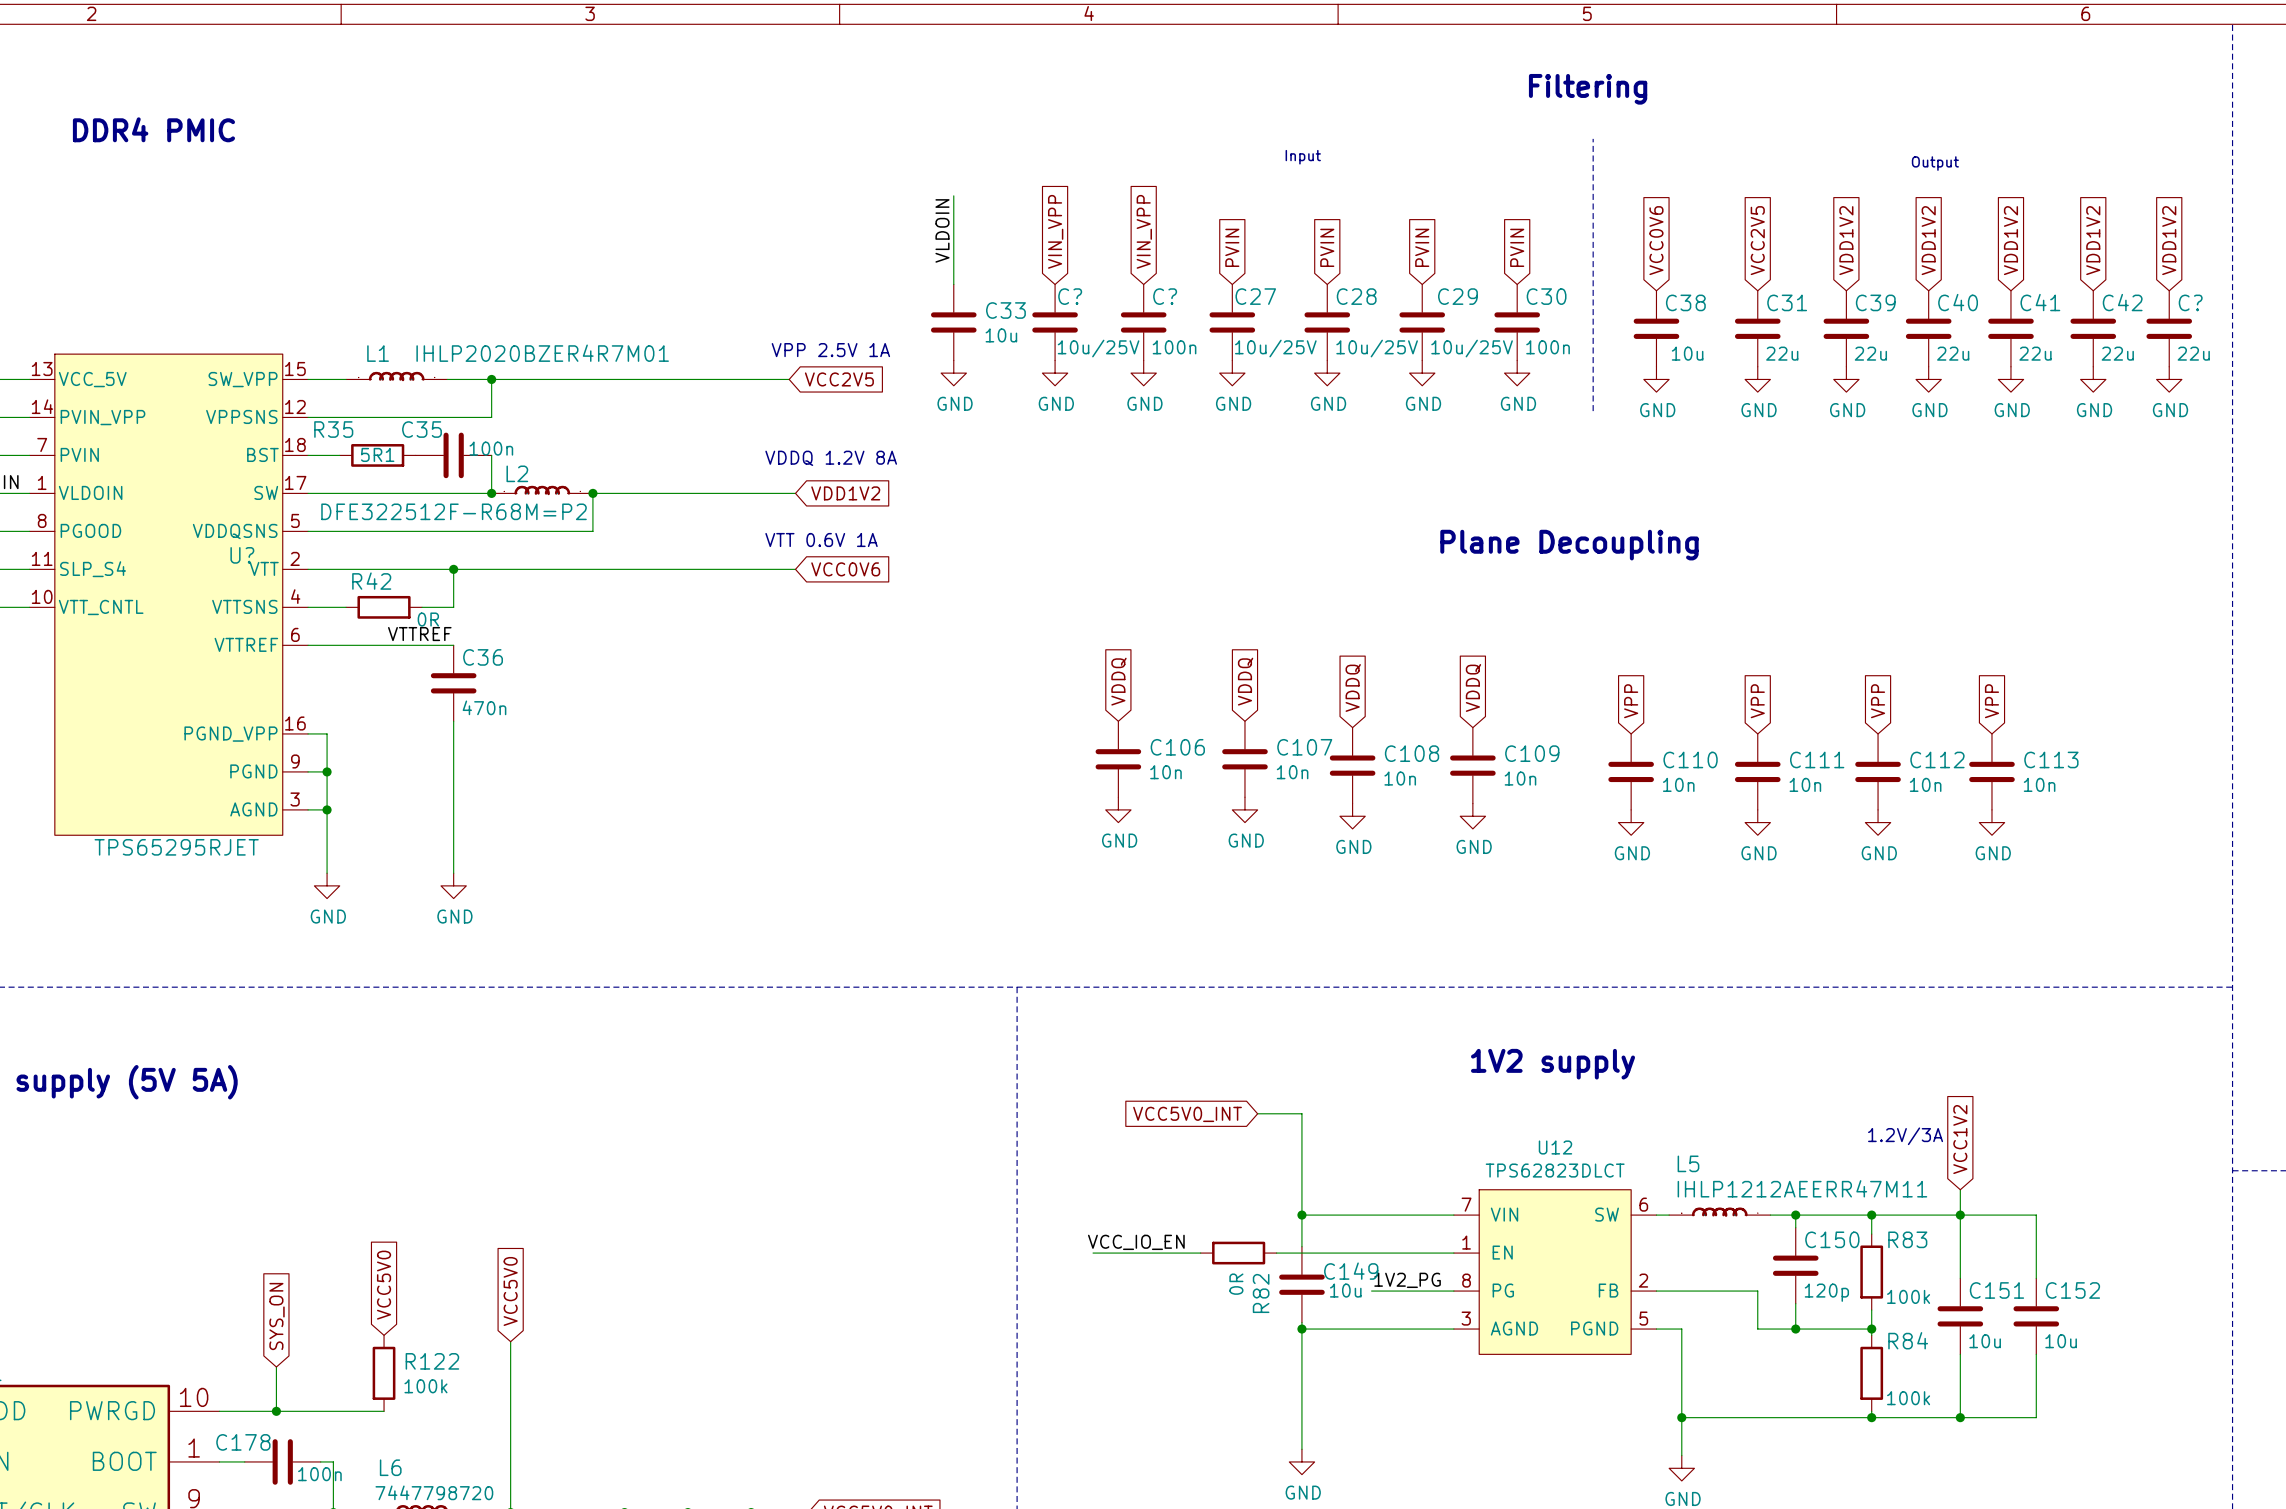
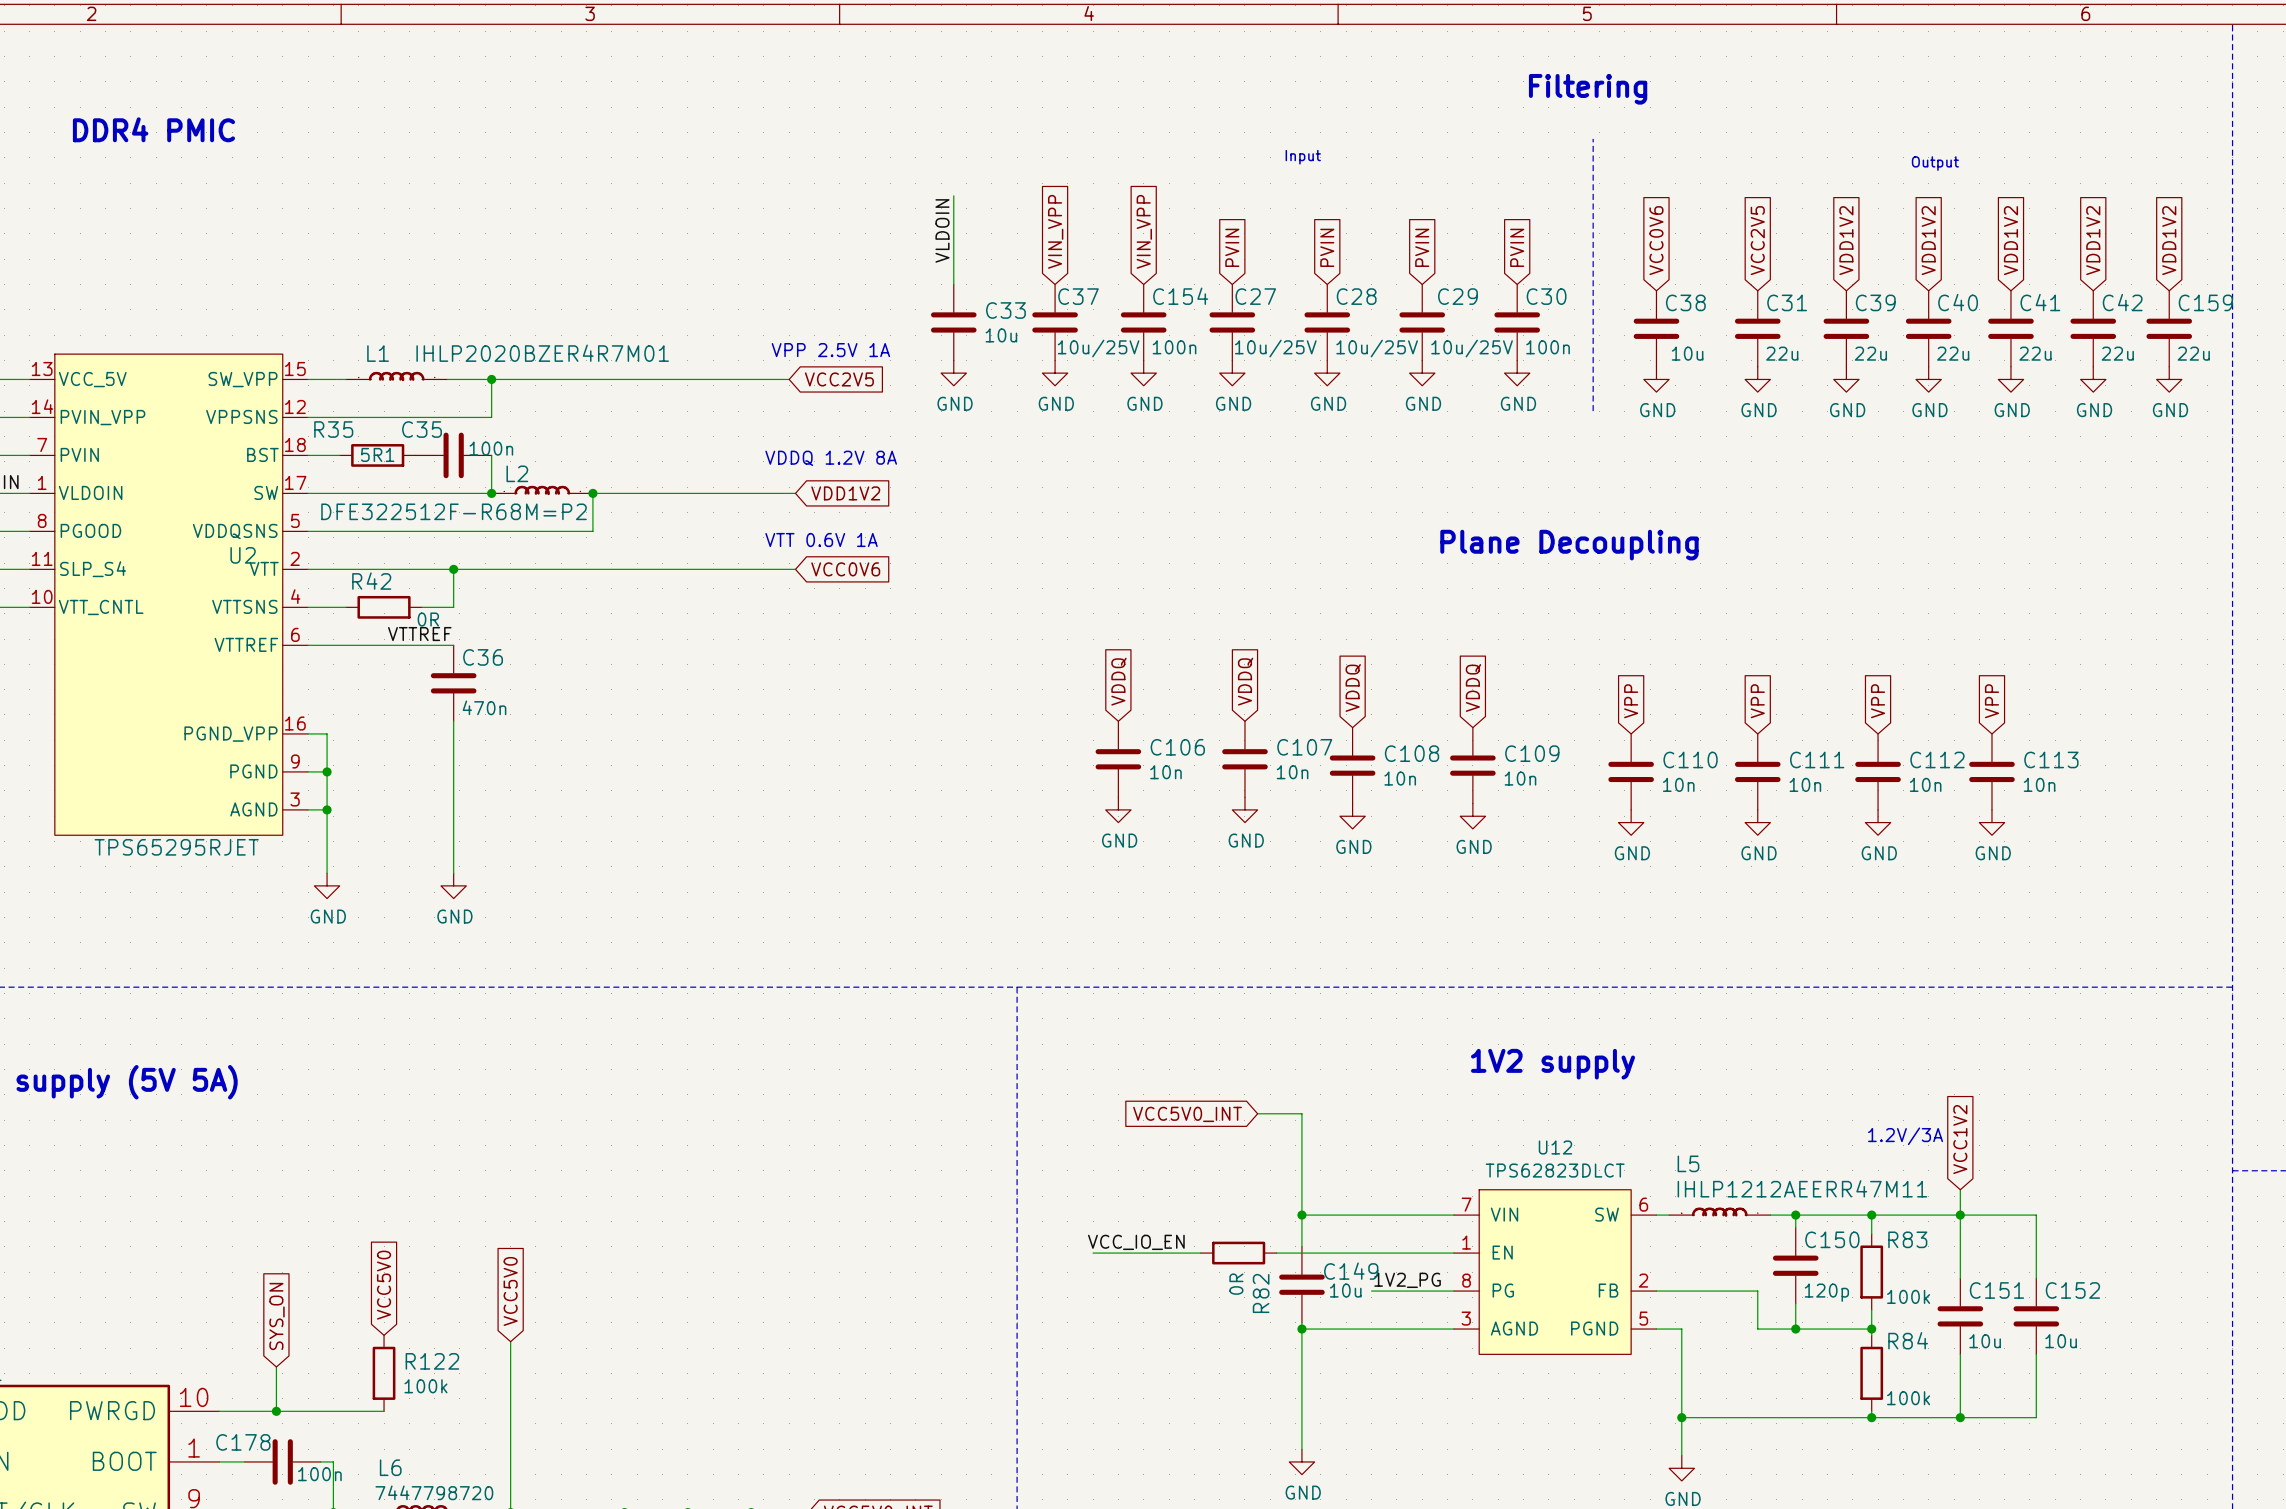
C? name: C? (1070, 296) -> C37 (1078, 296)
C? name: C? (1165, 296) -> C154 (1180, 296)
C? name: C? (2190, 302) -> C159 (2205, 302)
U? name: U? (242, 555) -> U2 (243, 555)

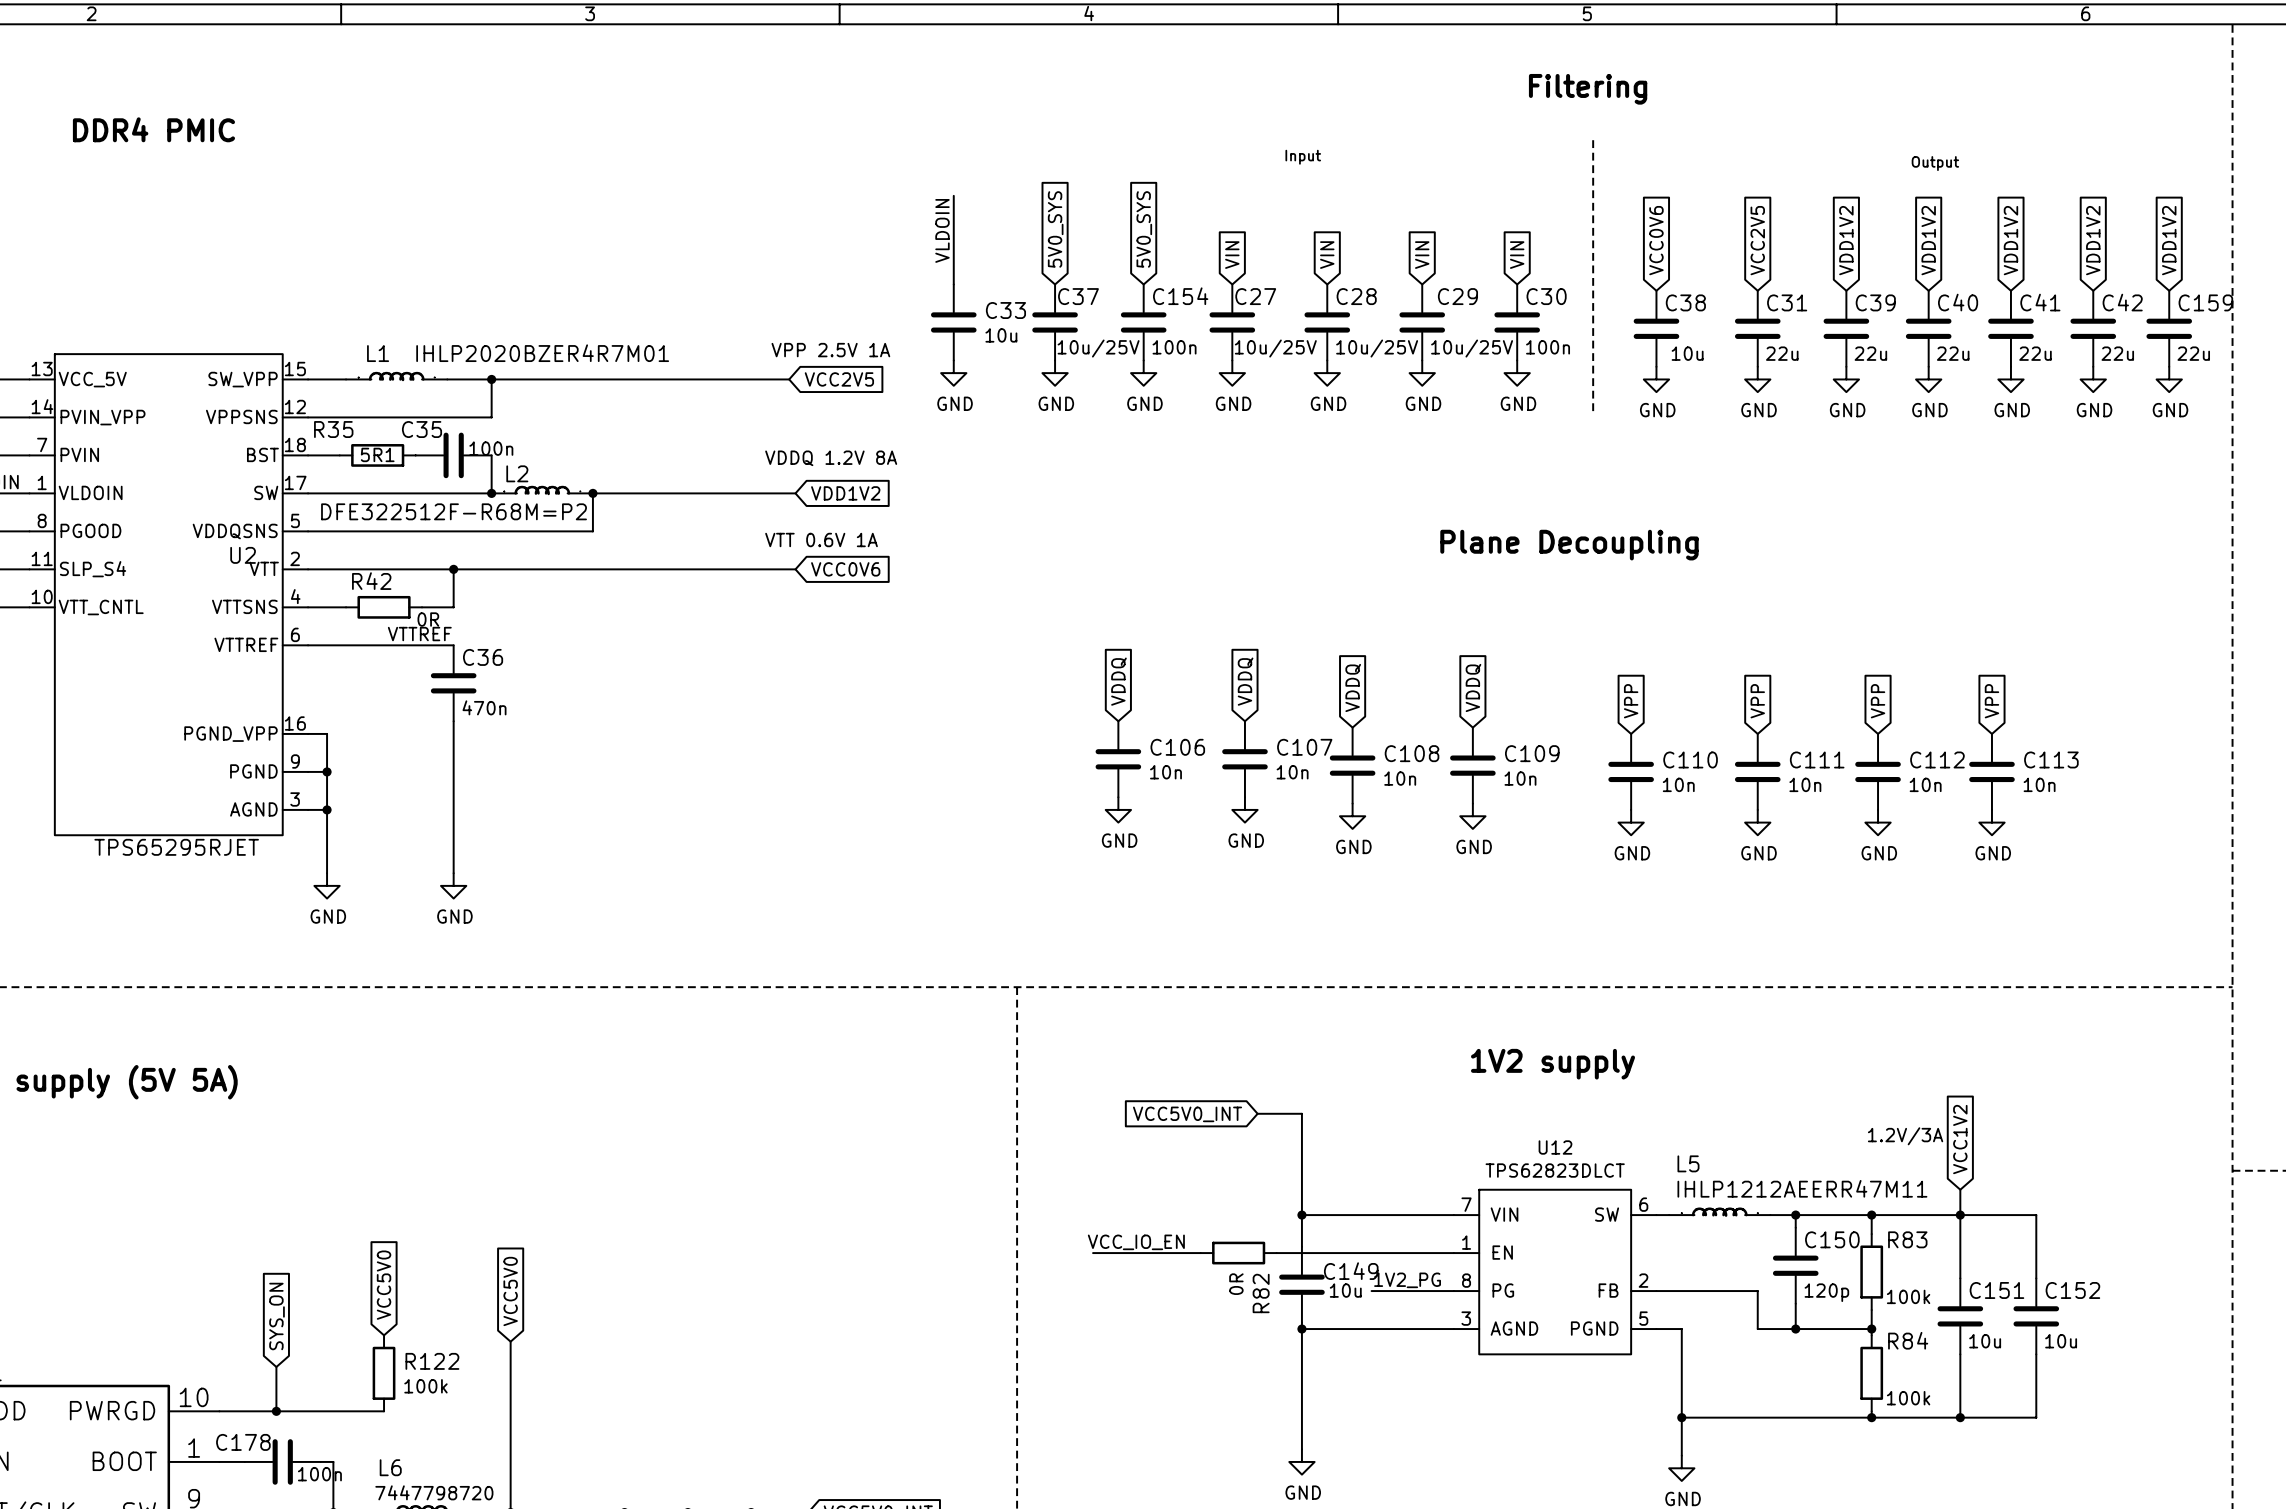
global label: VIN_VPP (1055, 231) -> 5V0_SYS (1055, 229)
global label: VIN_VPP (1144, 231) -> 5V0_SYS (1144, 229)
global label: PVIN (1232, 247) -> VIN (1232, 255)
global label: PVIN (1327, 247) -> VIN (1327, 255)
global label: PVIN (1422, 247) -> VIN (1422, 255)
global label: PVIN (1517, 247) -> VIN (1517, 255)

